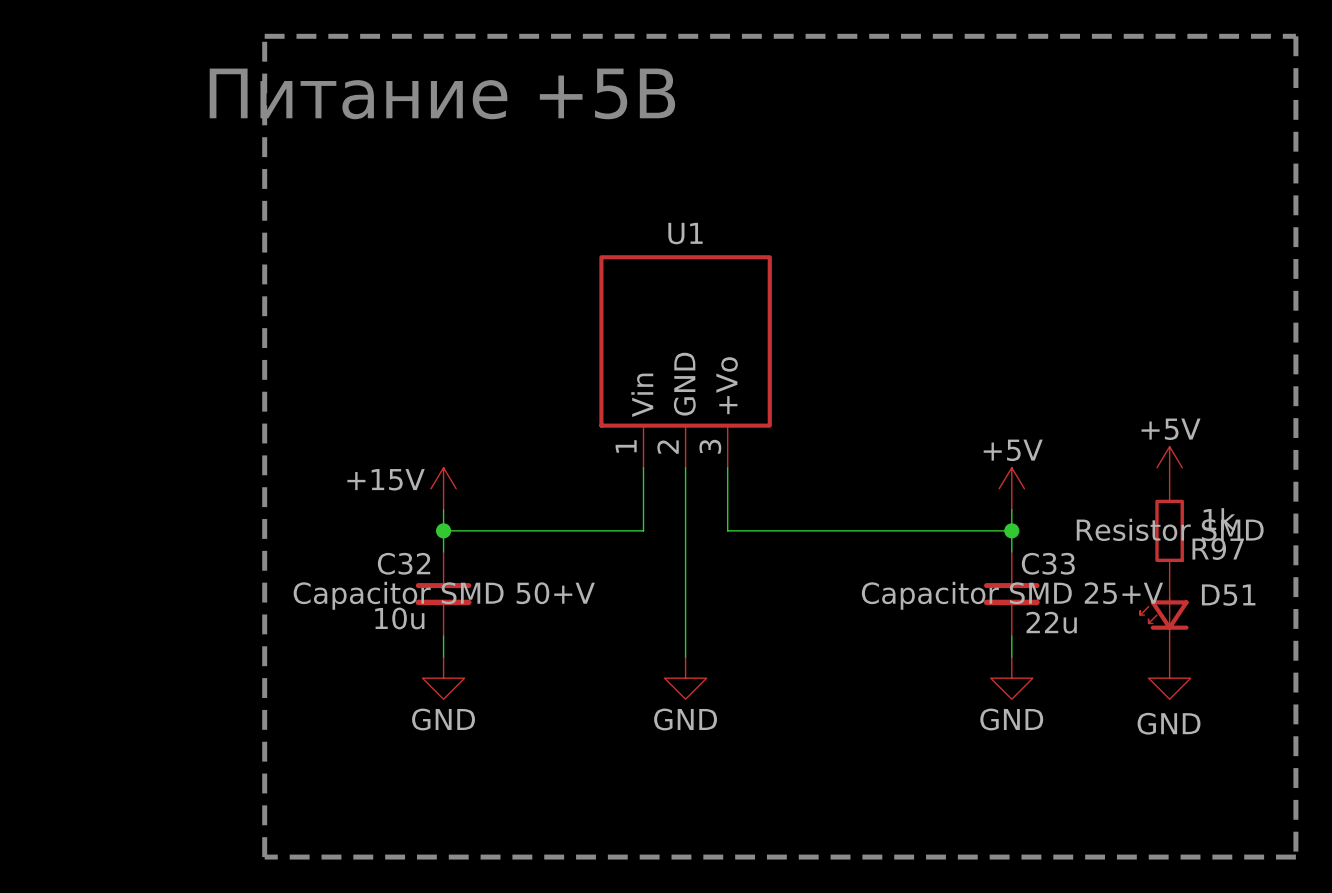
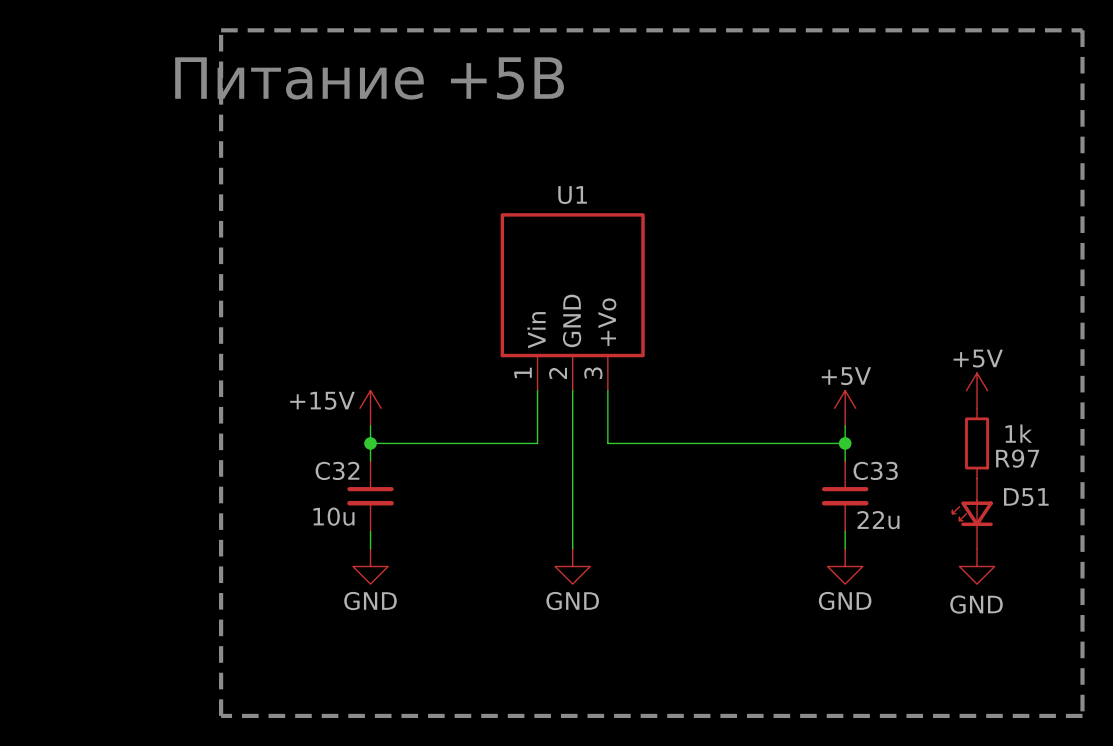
R97 text: Resistor SMD (1170, 529) -> none
C32 text: Capacitor SMD 50+V (444, 595) -> none
C33 text: Capacitor SMD 25+V (1012, 595) -> none

